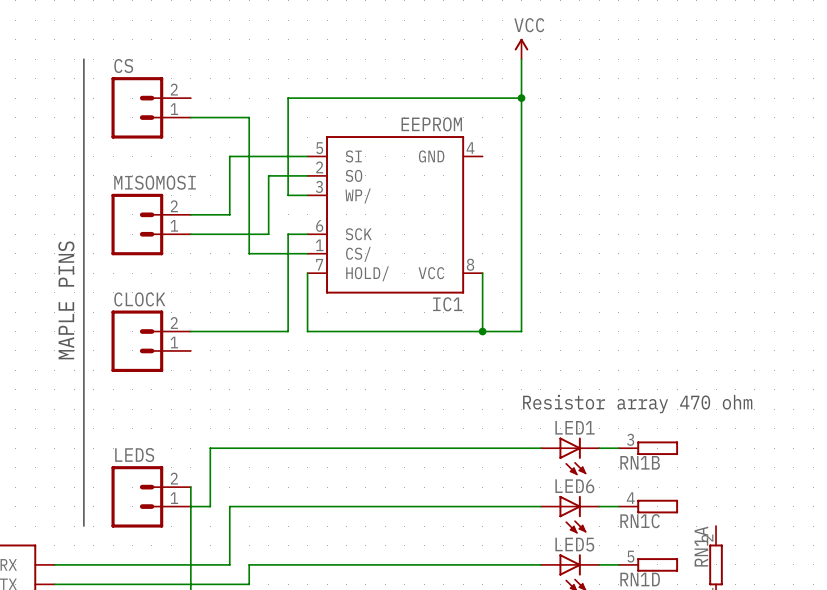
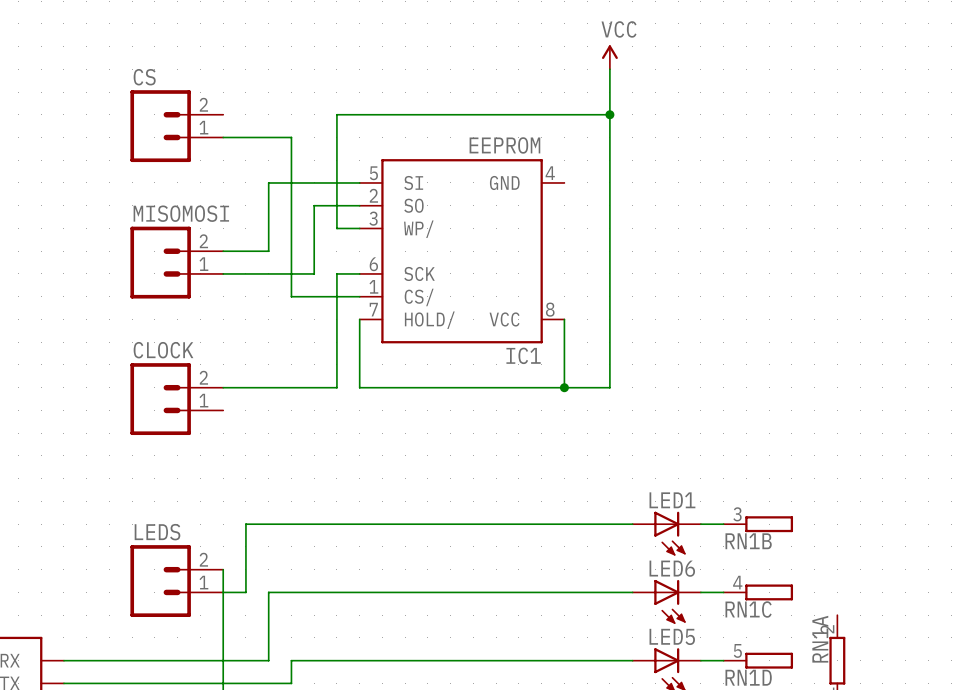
line: (83, 59) (83, 526) -> none
text: MAPLE PINS (66, 300) -> none
text: Resistor array 470 ohm (637, 403) -> none

